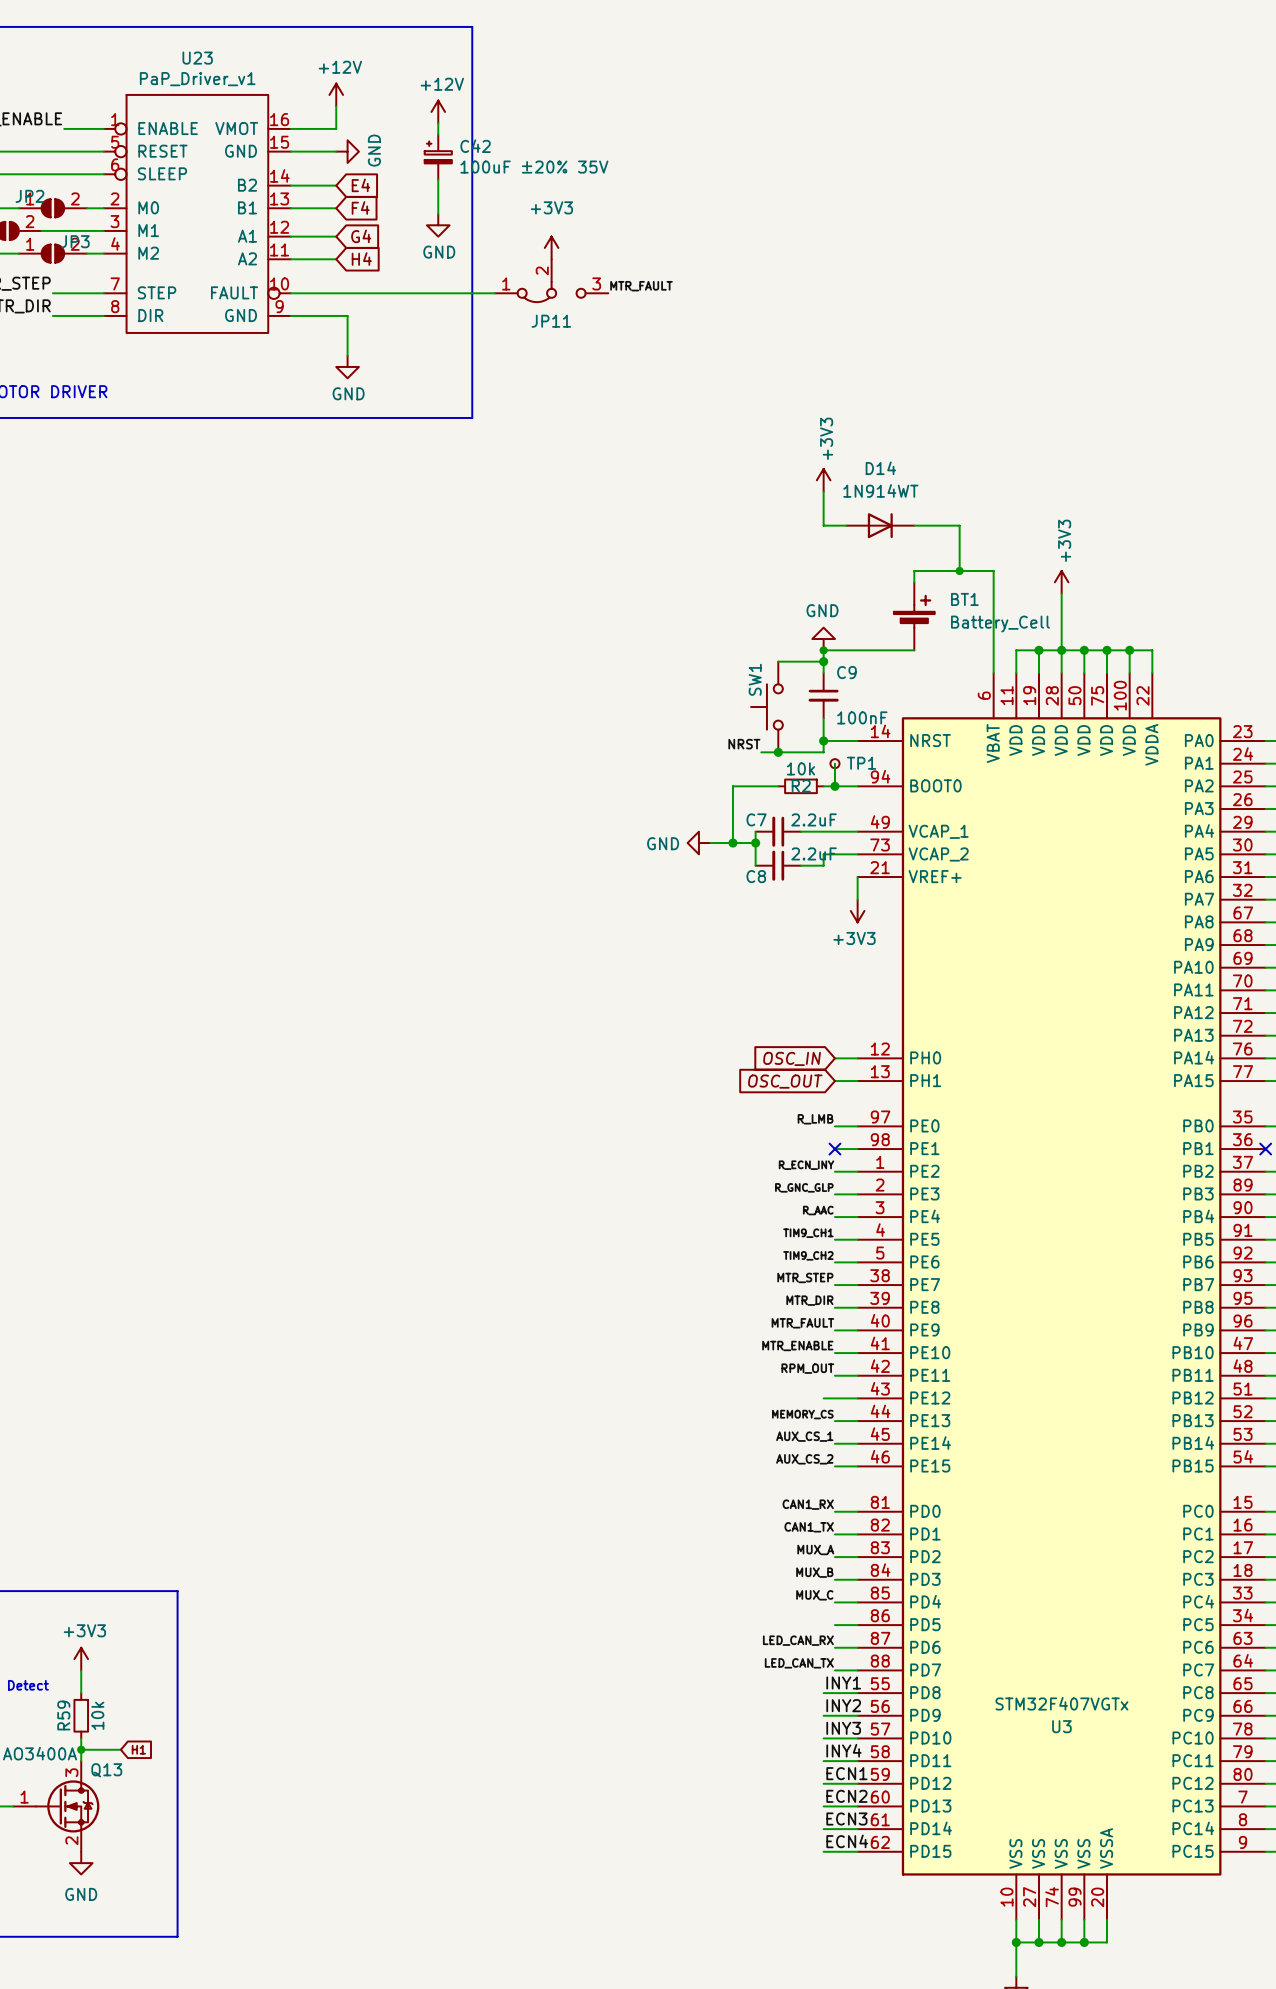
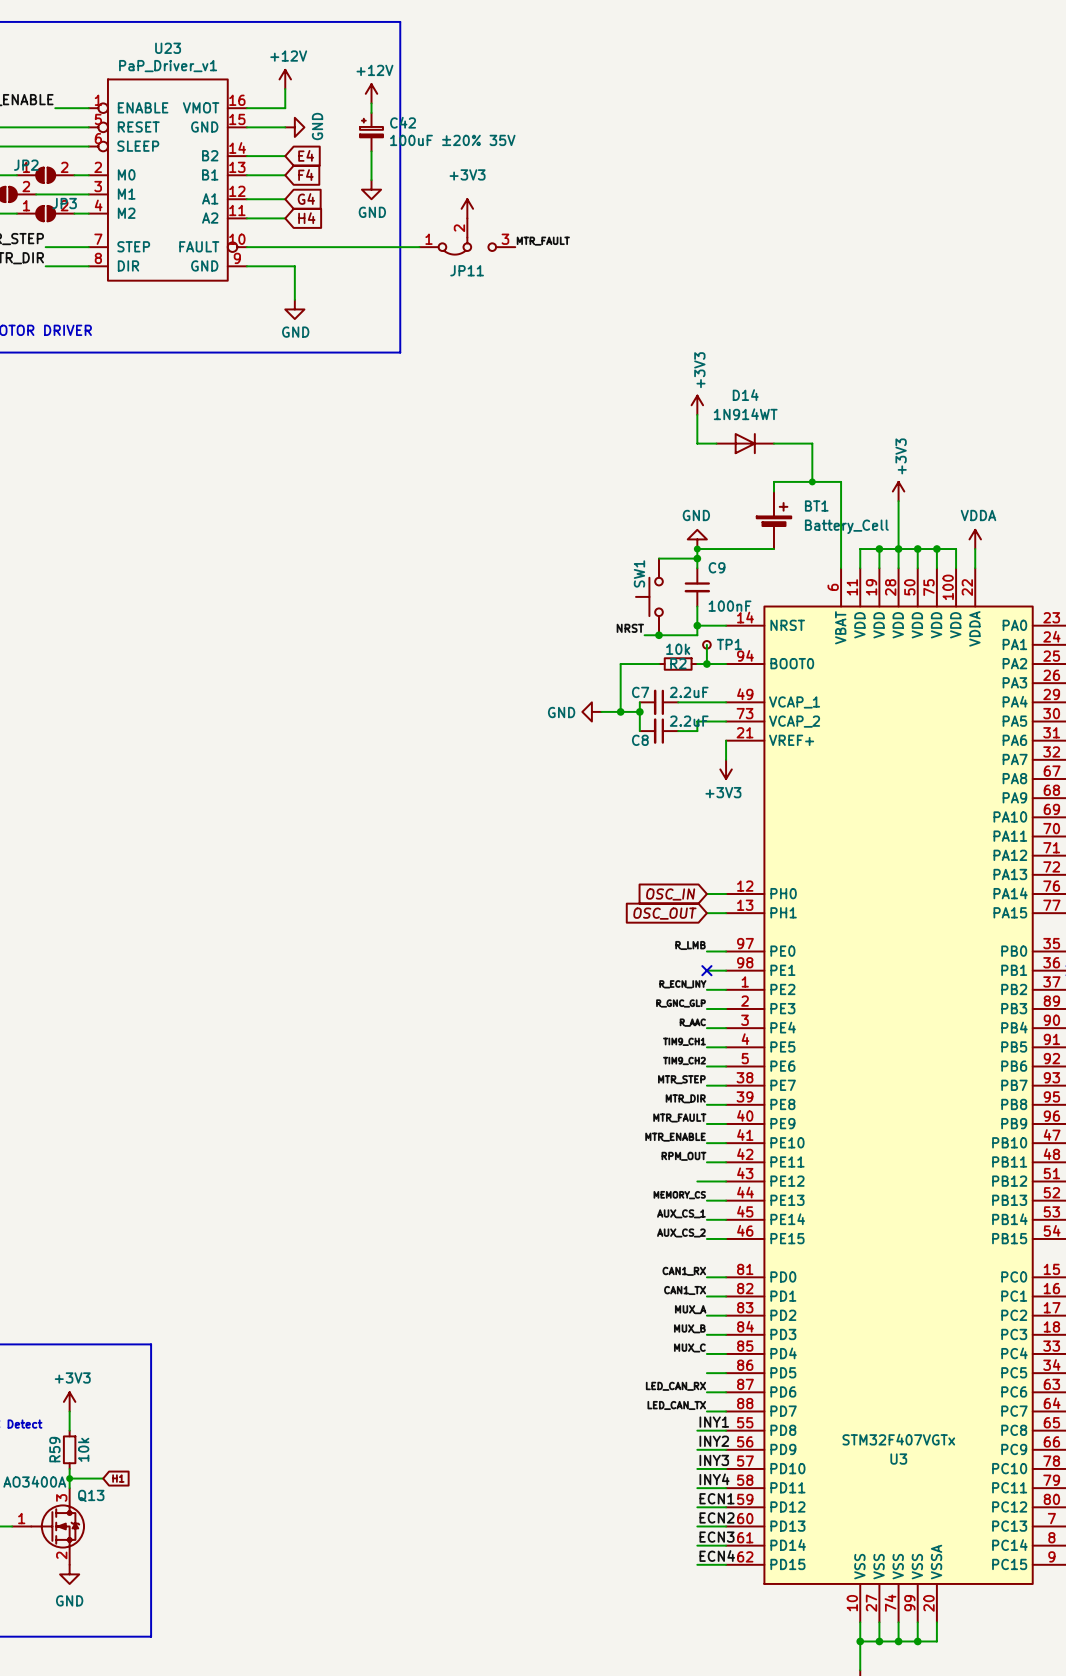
power symbol: none -> VDDA (975, 539)
wire: (1129, 650) (1152, 650) -> none
junction: (1129, 650) -> none

